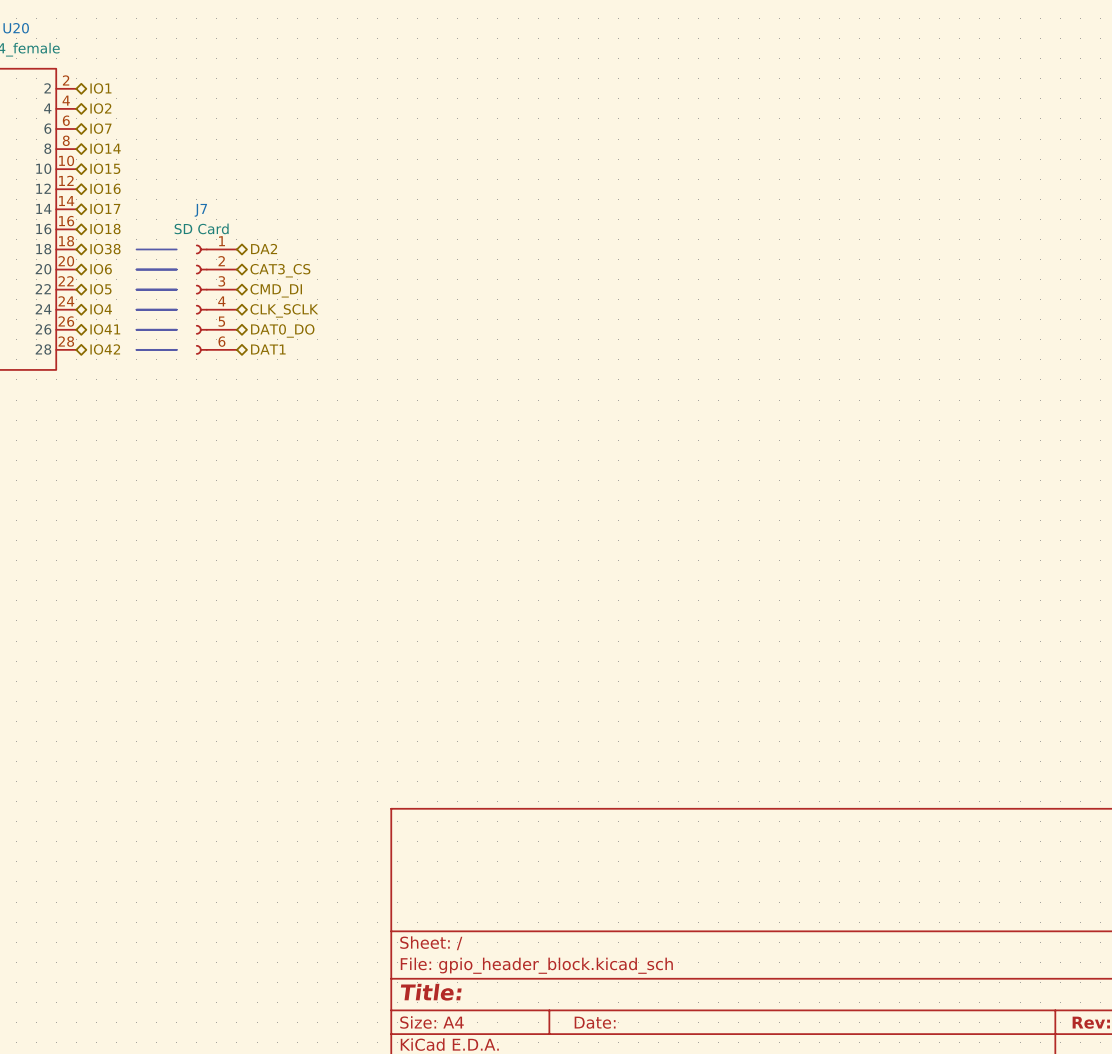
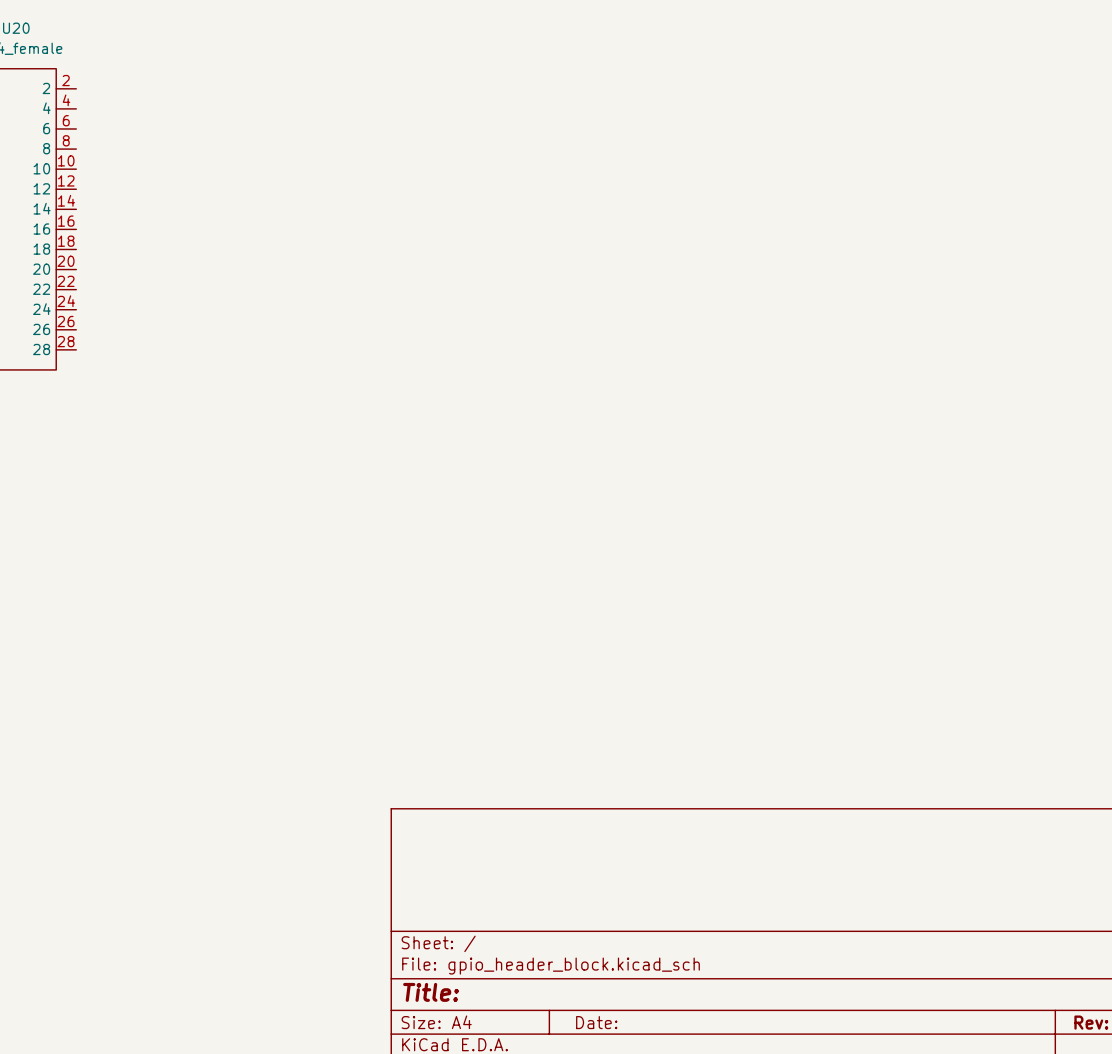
hierarchical label: IO1 (100, 88) -> none
hierarchical label: IO2 (100, 108) -> none
hierarchical label: IO7 (100, 128) -> none
hierarchical label: IO14 (105, 148) -> none
hierarchical label: IO15 (105, 168) -> none
hierarchical label: IO16 (105, 188) -> none
hierarchical label: IO17 (105, 208) -> none
hierarchical label: IO18 (105, 229) -> none
hierarchical label: IO38 (105, 249) -> none
line: (136, 249) (176, 249) -> none
hierarchical label: DA2 (264, 249) -> none
hierarchical label: IO6 (101, 269) -> none
line: (136, 269) (176, 269) -> none
hierarchical label: CAT3_CS (280, 270) -> none
hierarchical label: IO5 (100, 289) -> none
line: (136, 289) (176, 289) -> none
hierarchical label: CMD_DI (276, 290) -> none
J7: SD Card (216, 299) -> none
hierarchical label: IO4 (101, 309) -> none
line: (136, 309) (176, 309) -> none
hierarchical label: CLK_SCLK (284, 310) -> none
hierarchical label: IO41 (105, 329) -> none
line: (136, 329) (176, 329) -> none
hierarchical label: DAT0_DO (282, 330) -> none
hierarchical label: IO42 (105, 349) -> none
line: (136, 349) (176, 349) -> none
hierarchical label: DAT1 (268, 349) -> none

